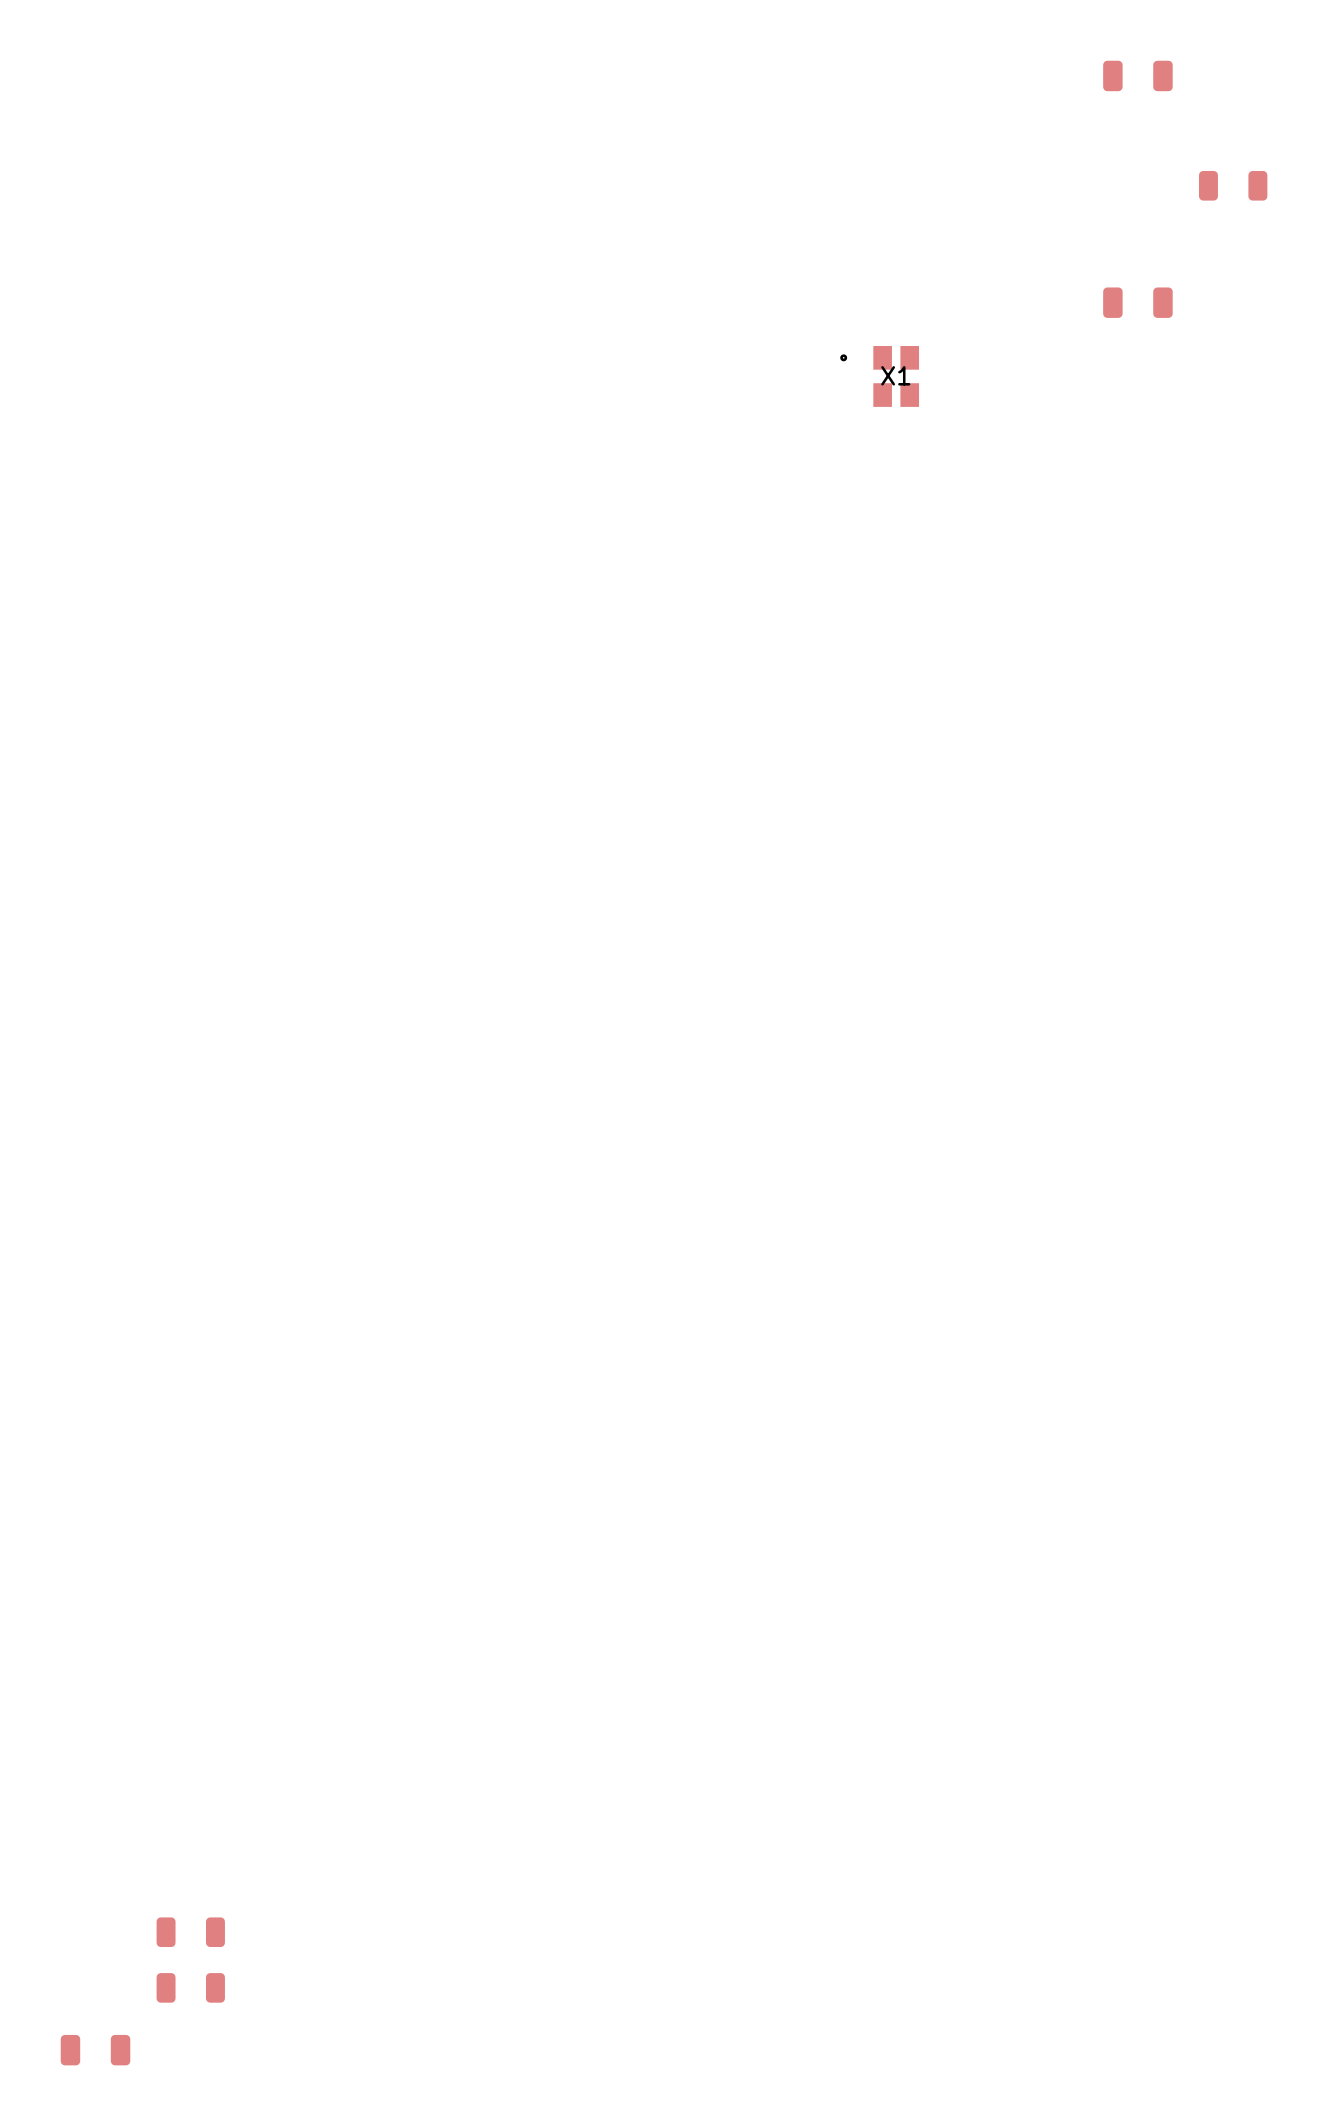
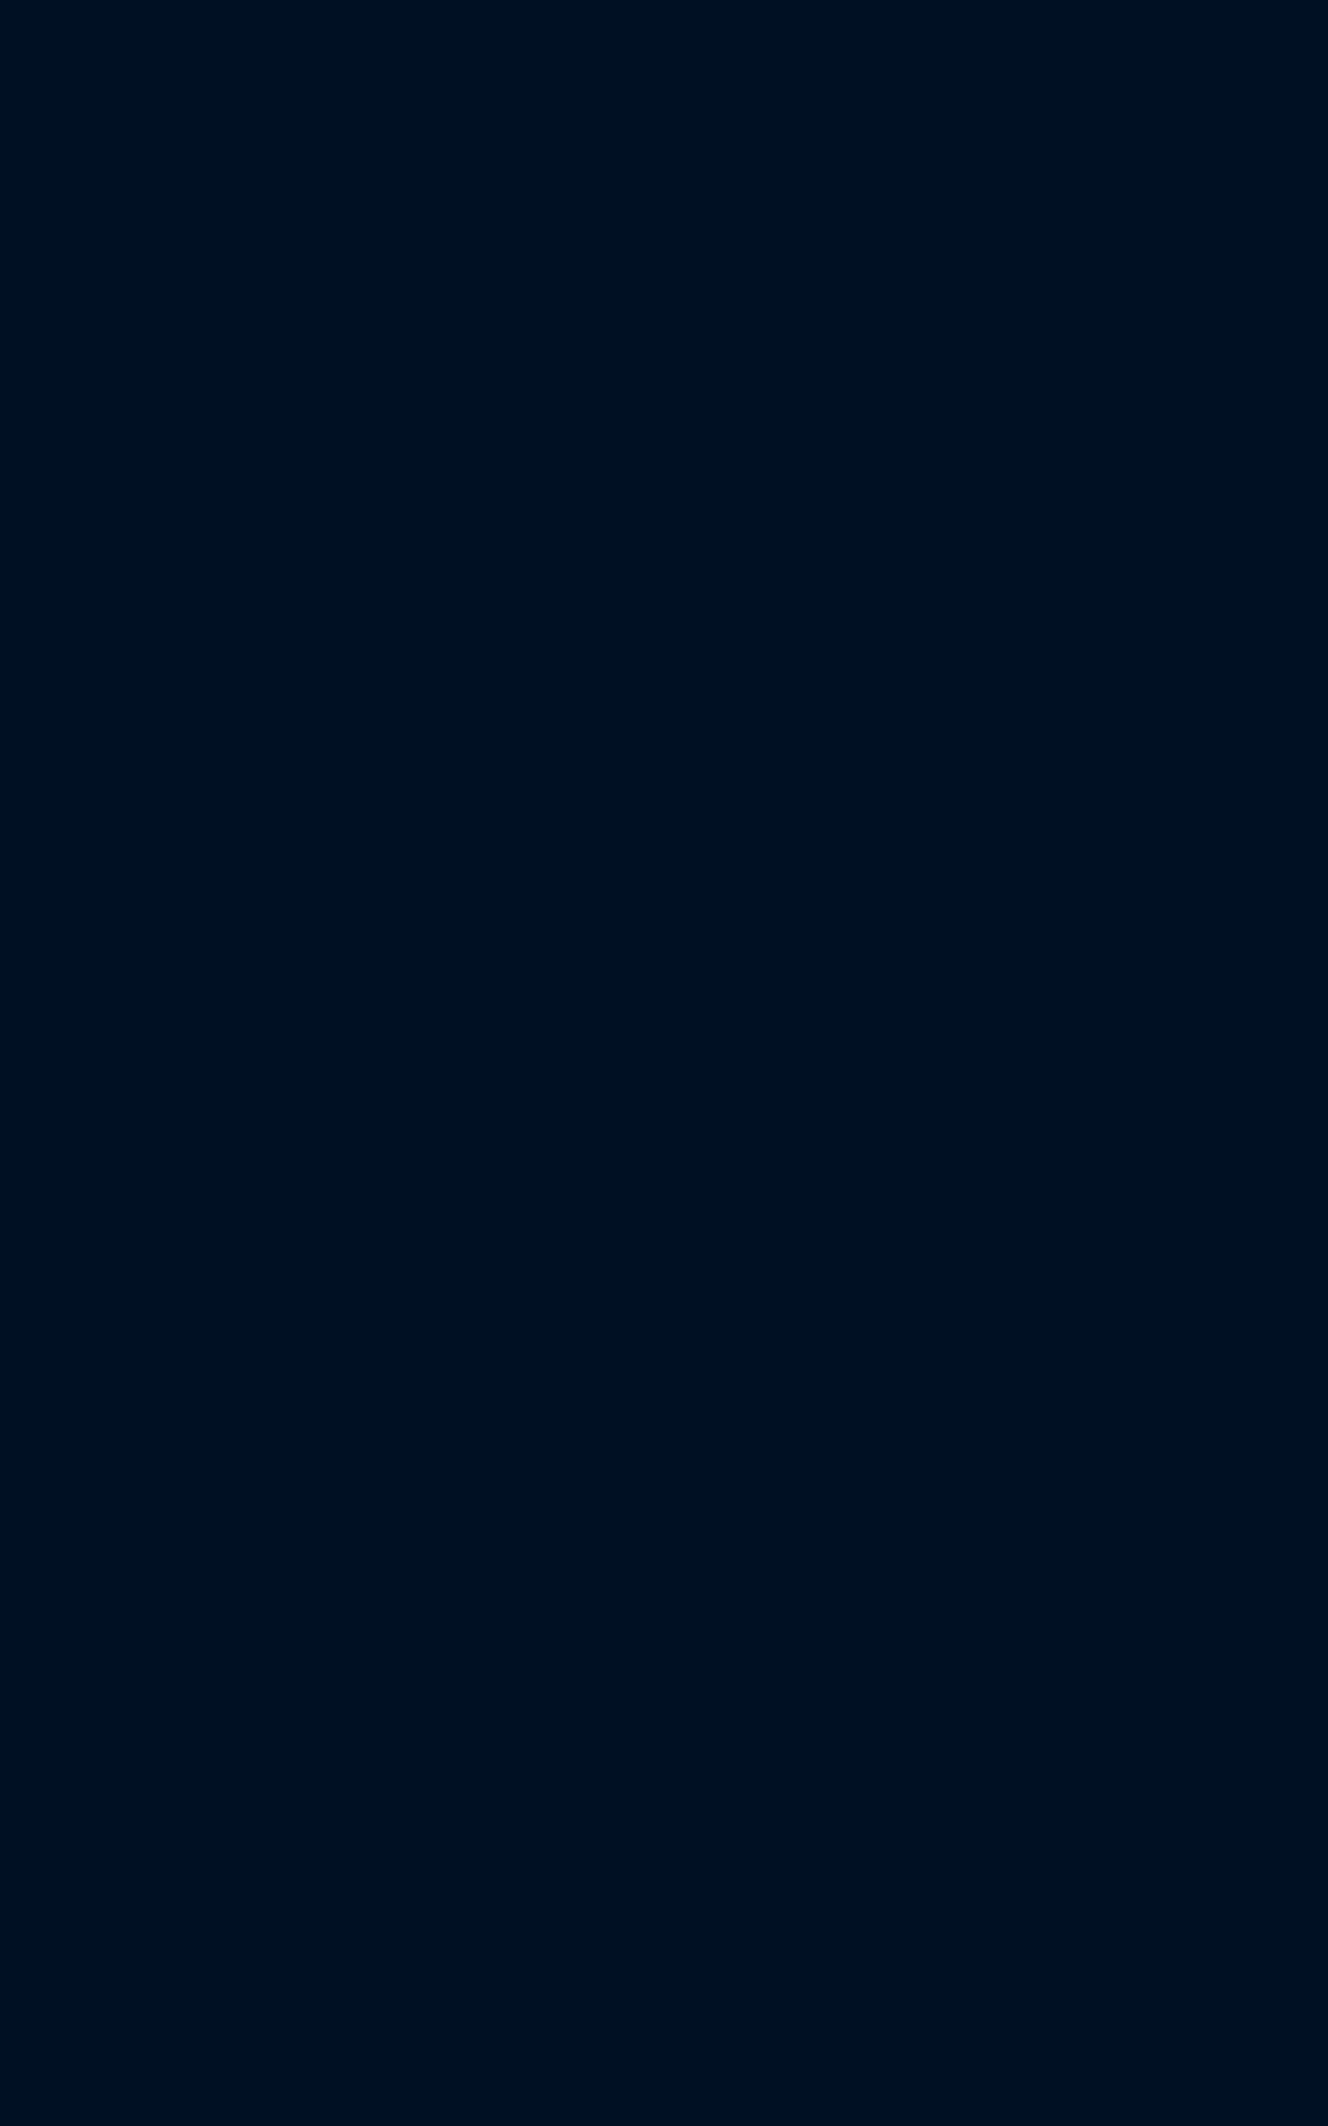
part: (1137, 75) -> none
part: (1233, 185) -> none
part: (1137, 302) -> none
X1: (879, 376) -> none
part: (190, 1932) -> none
part: (190, 1987) -> none
part: (95, 2050) -> none

